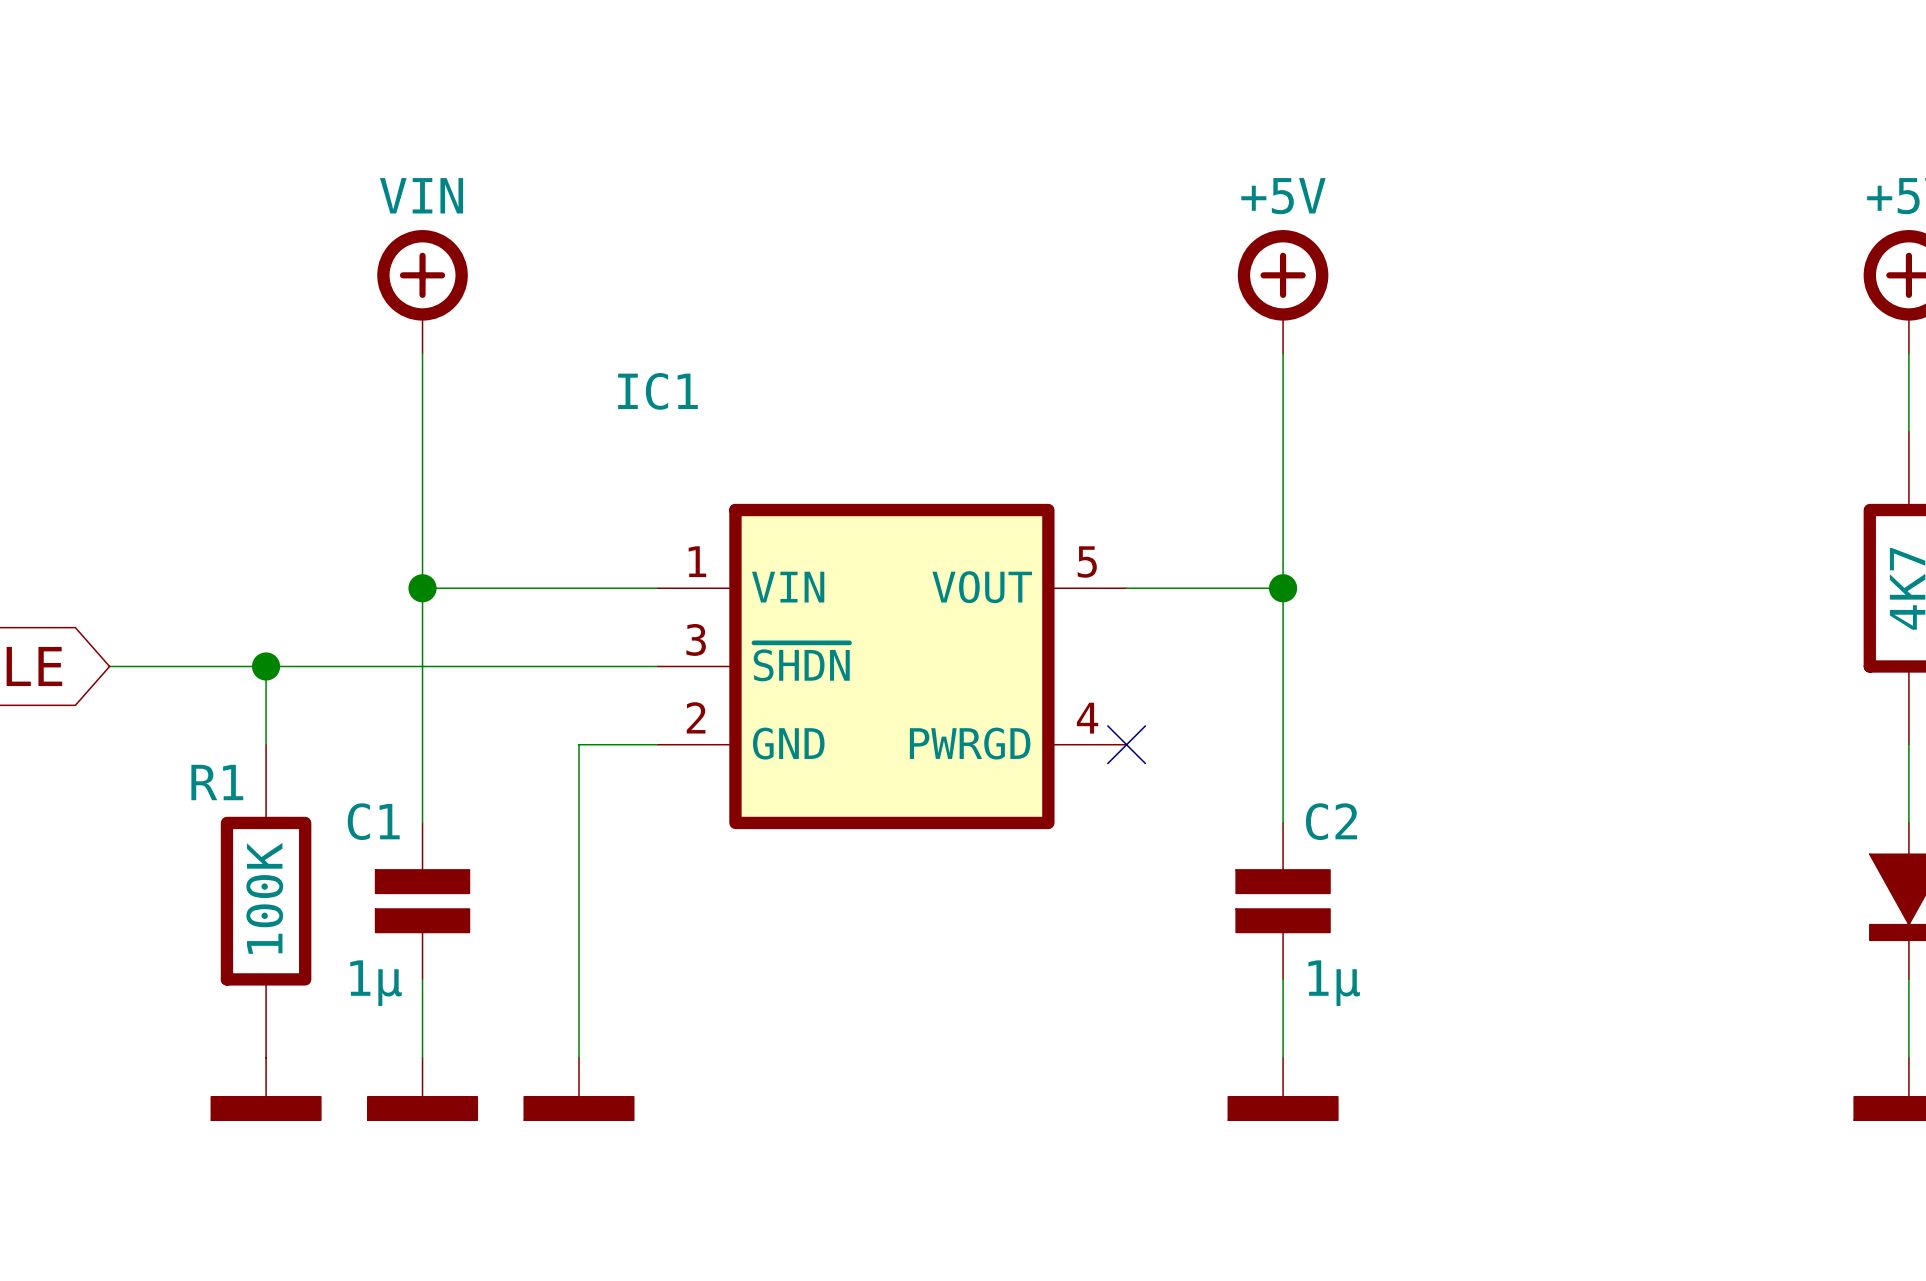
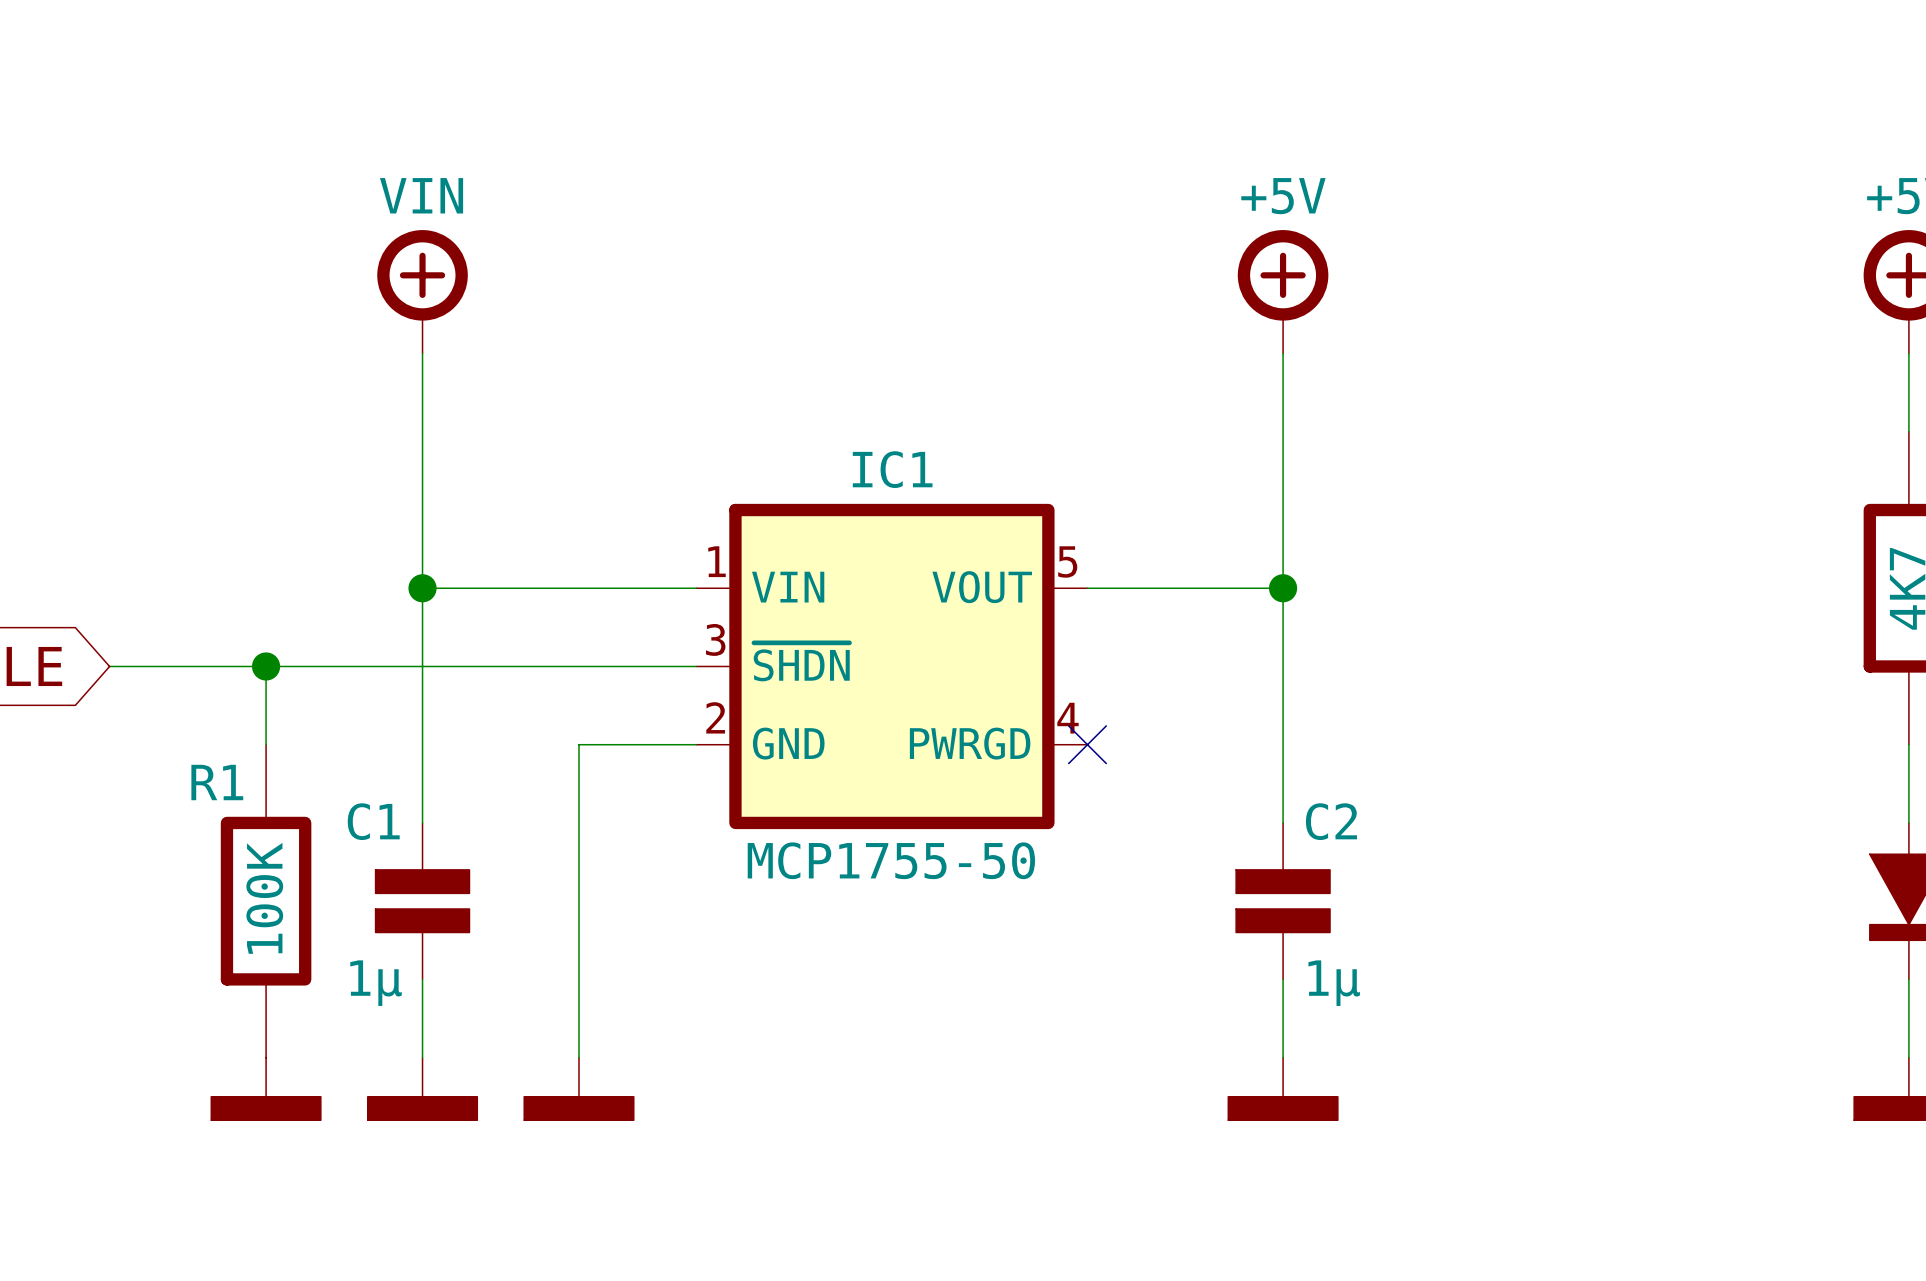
IC1 name position: IC1 (657, 391) -> IC1 (892, 469)
IC1 symbol: [657, 503, 1127, 830] -> [696, 503, 1088, 830]
no-connect mark position: (1126, 744) -> (1087, 744)
IC1 text: none -> MCP1755-50 (891, 860)

